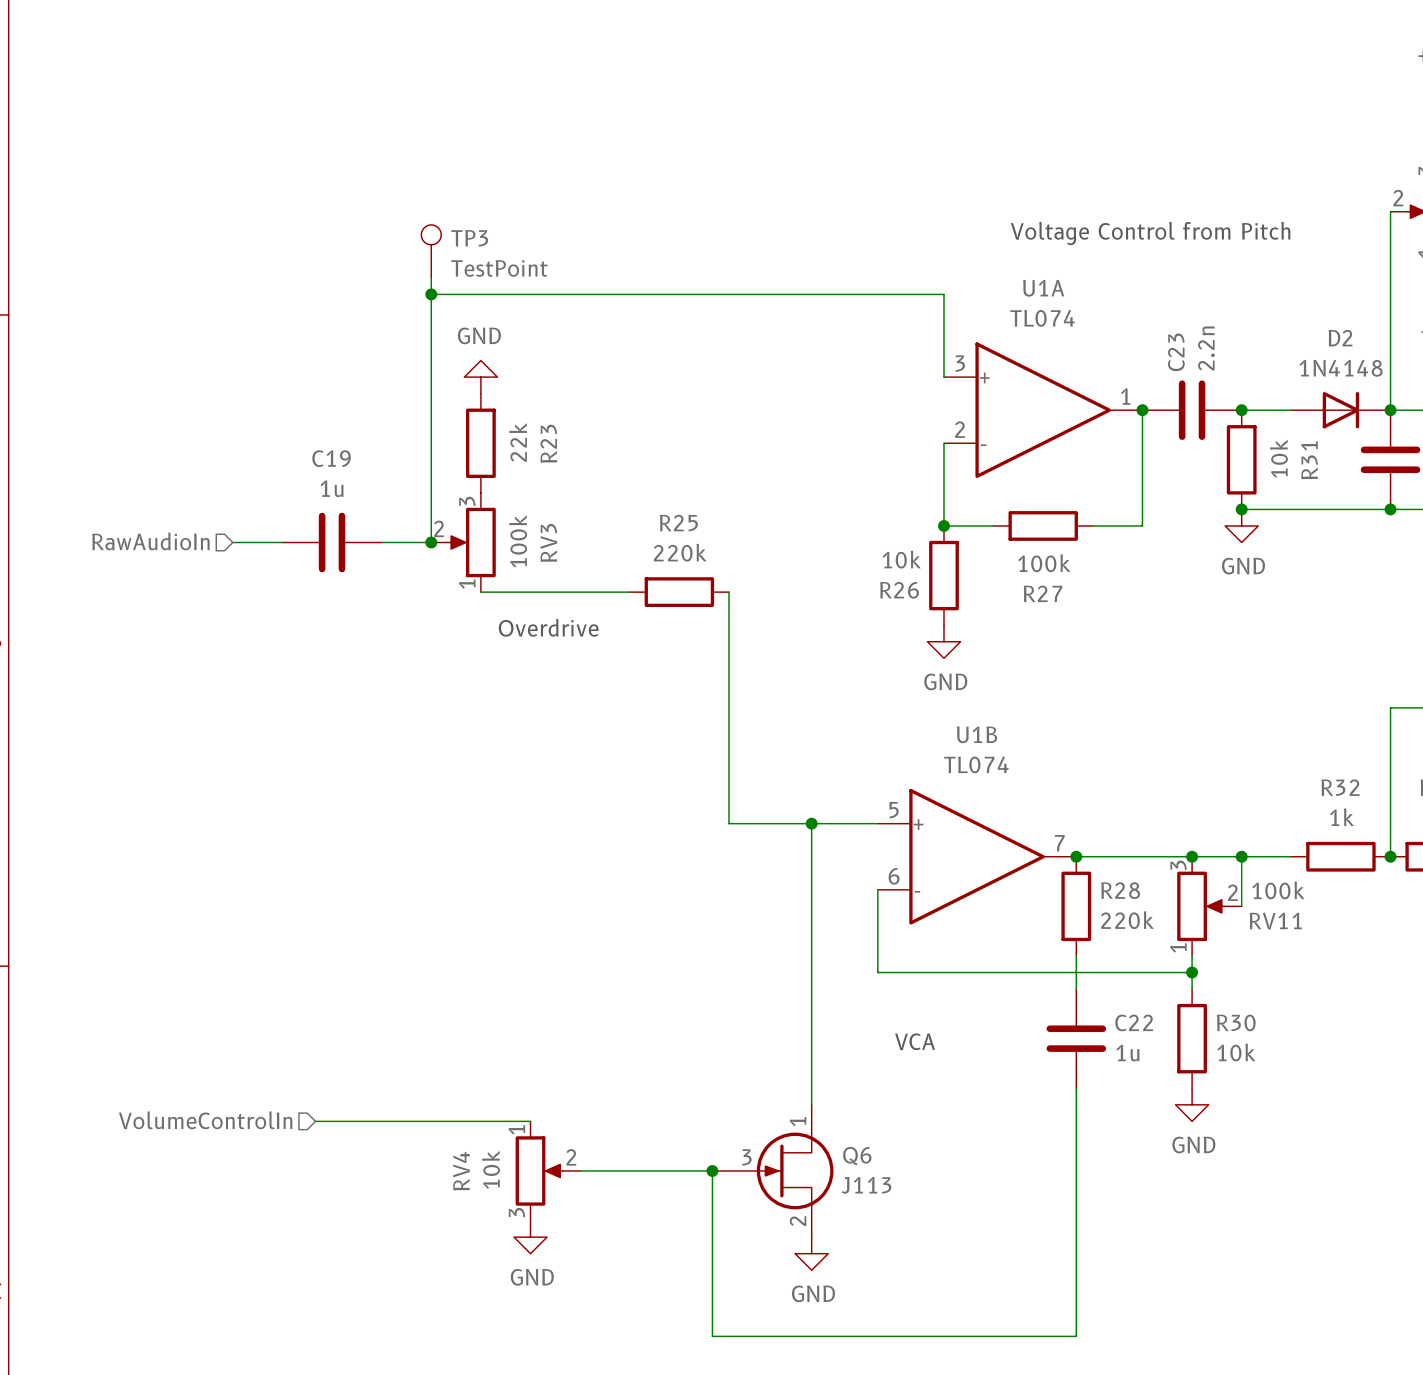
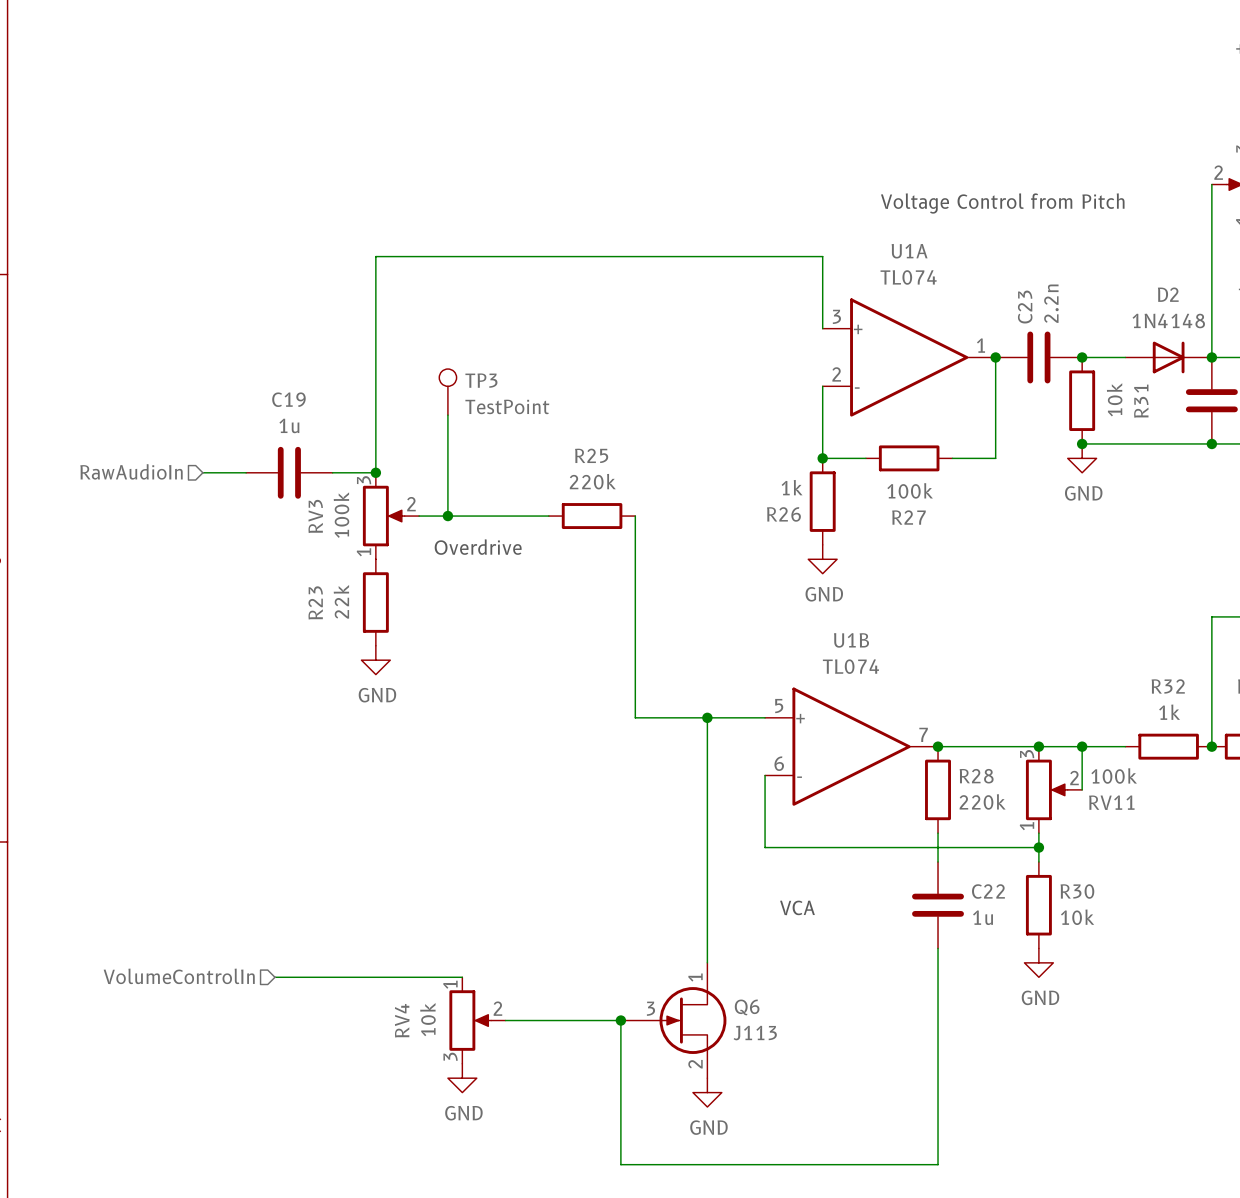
TP3 position: (431, 251) -> (447, 392)
wire: (431, 277) (431, 294) -> none
junction: (431, 294) -> none
power symbol: GND (480, 377) -> none
R23 value position: 22k (518, 442) -> 22k (341, 601)
R23 position: (480, 443) -> (375, 602)
R23 name position: R23 (548, 443) -> R23 (315, 602)
wire: none -> (447, 415) (447, 516)
RV3 flip: as is (471, 542) -> left-right (383, 516)
R26 value: 10k (901, 559) -> 1k (792, 487)
junction: none -> (447, 516)
power symbol: none -> GND (375, 660)

